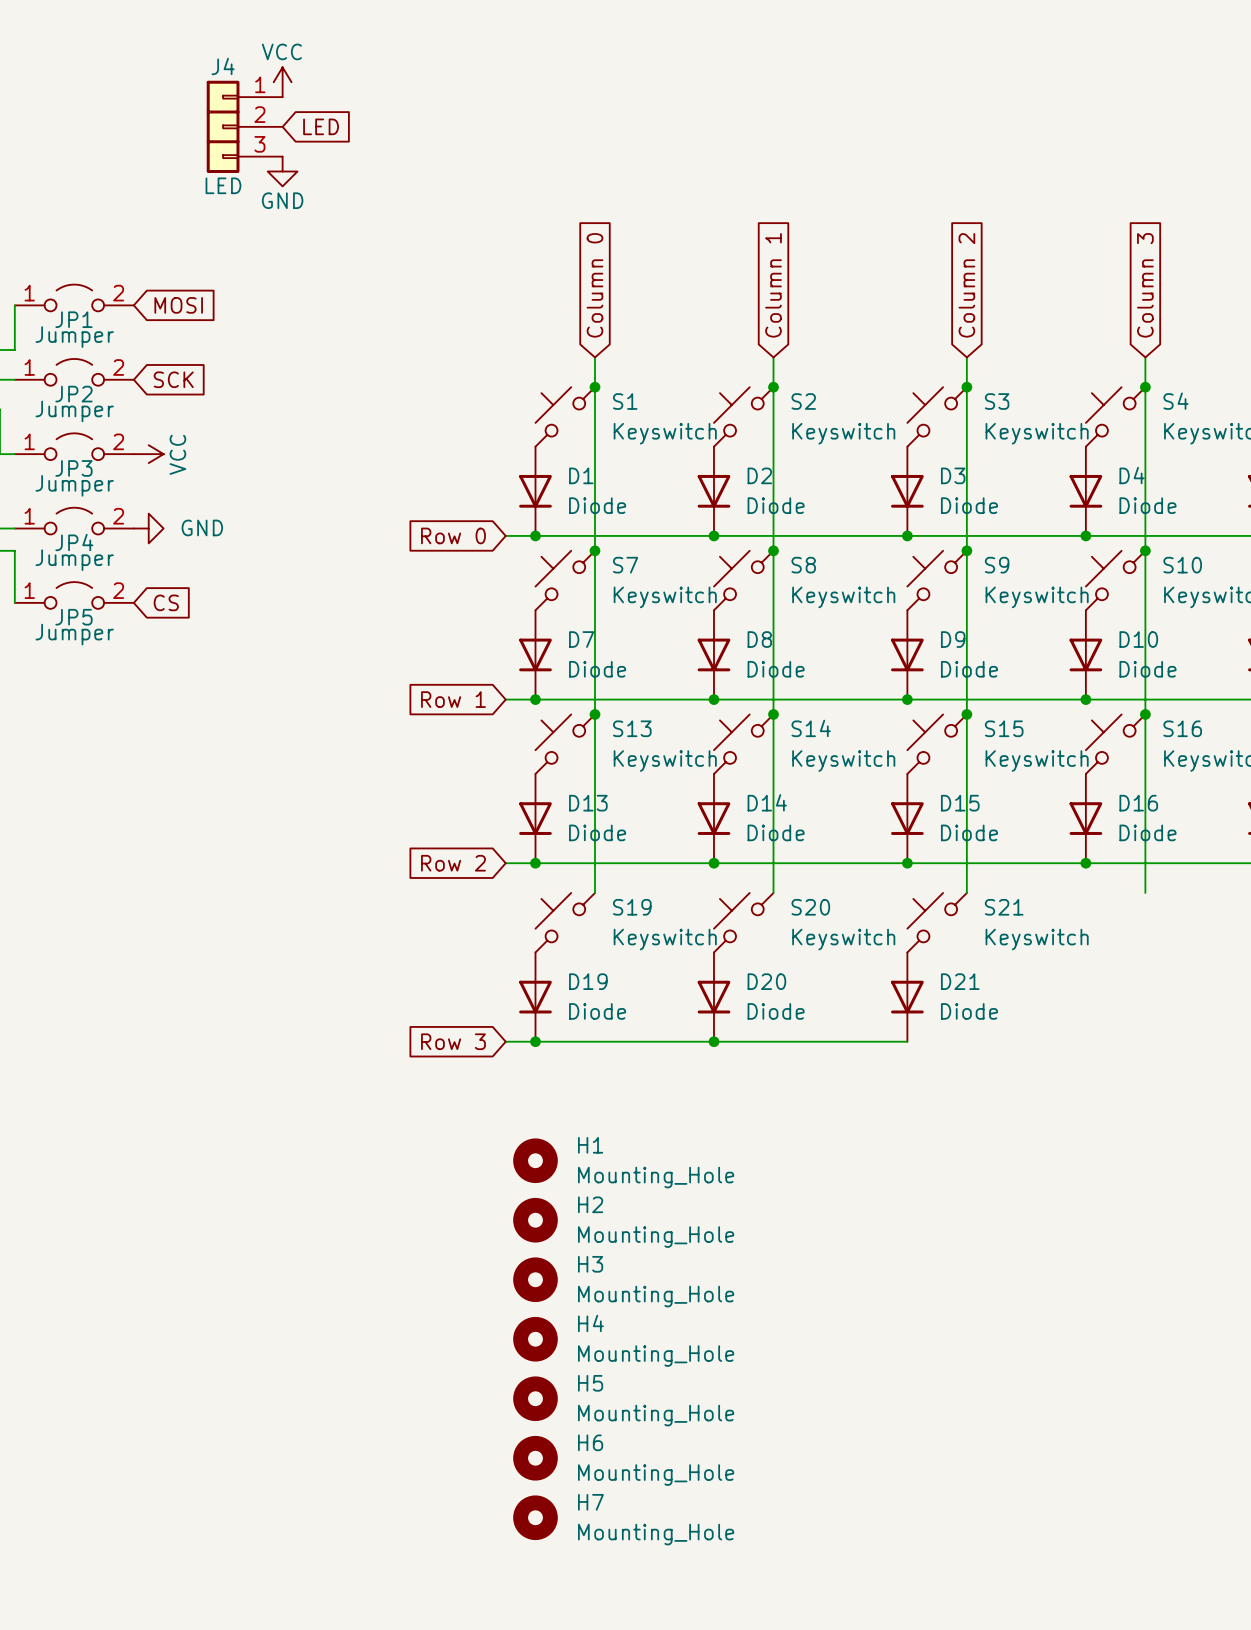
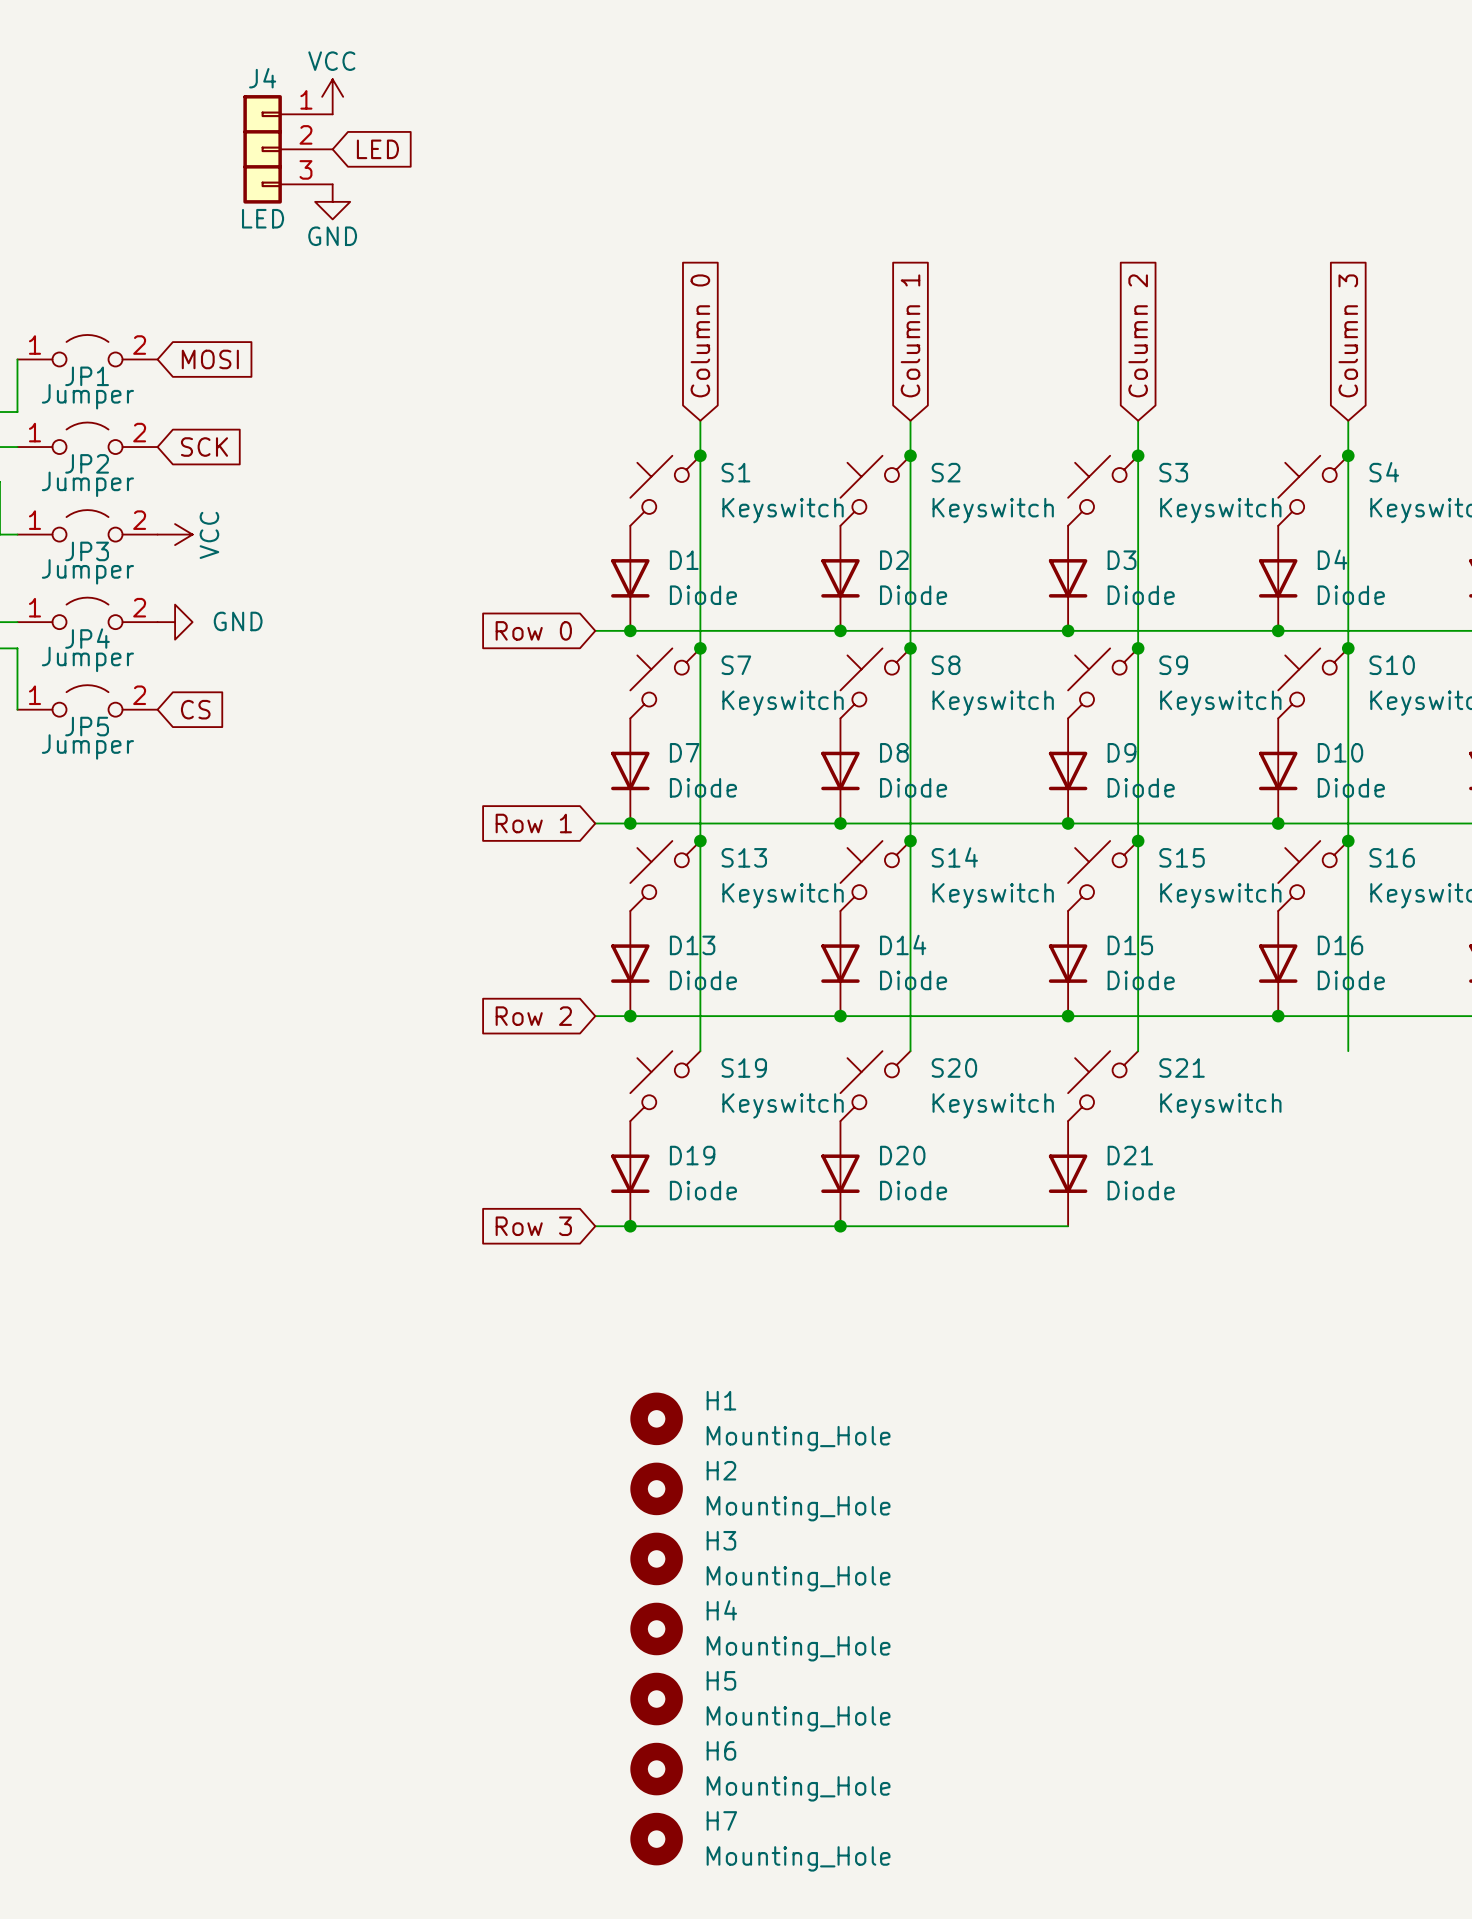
H1 position: (535, 1160) -> (656, 1418)
H2 position: (535, 1220) -> (656, 1488)
H3 position: (535, 1279) -> (656, 1558)
H4 position: (535, 1339) -> (656, 1628)
H5 position: (535, 1398) -> (656, 1699)
H6 position: (535, 1458) -> (656, 1769)
H7 position: (535, 1517) -> (656, 1839)

